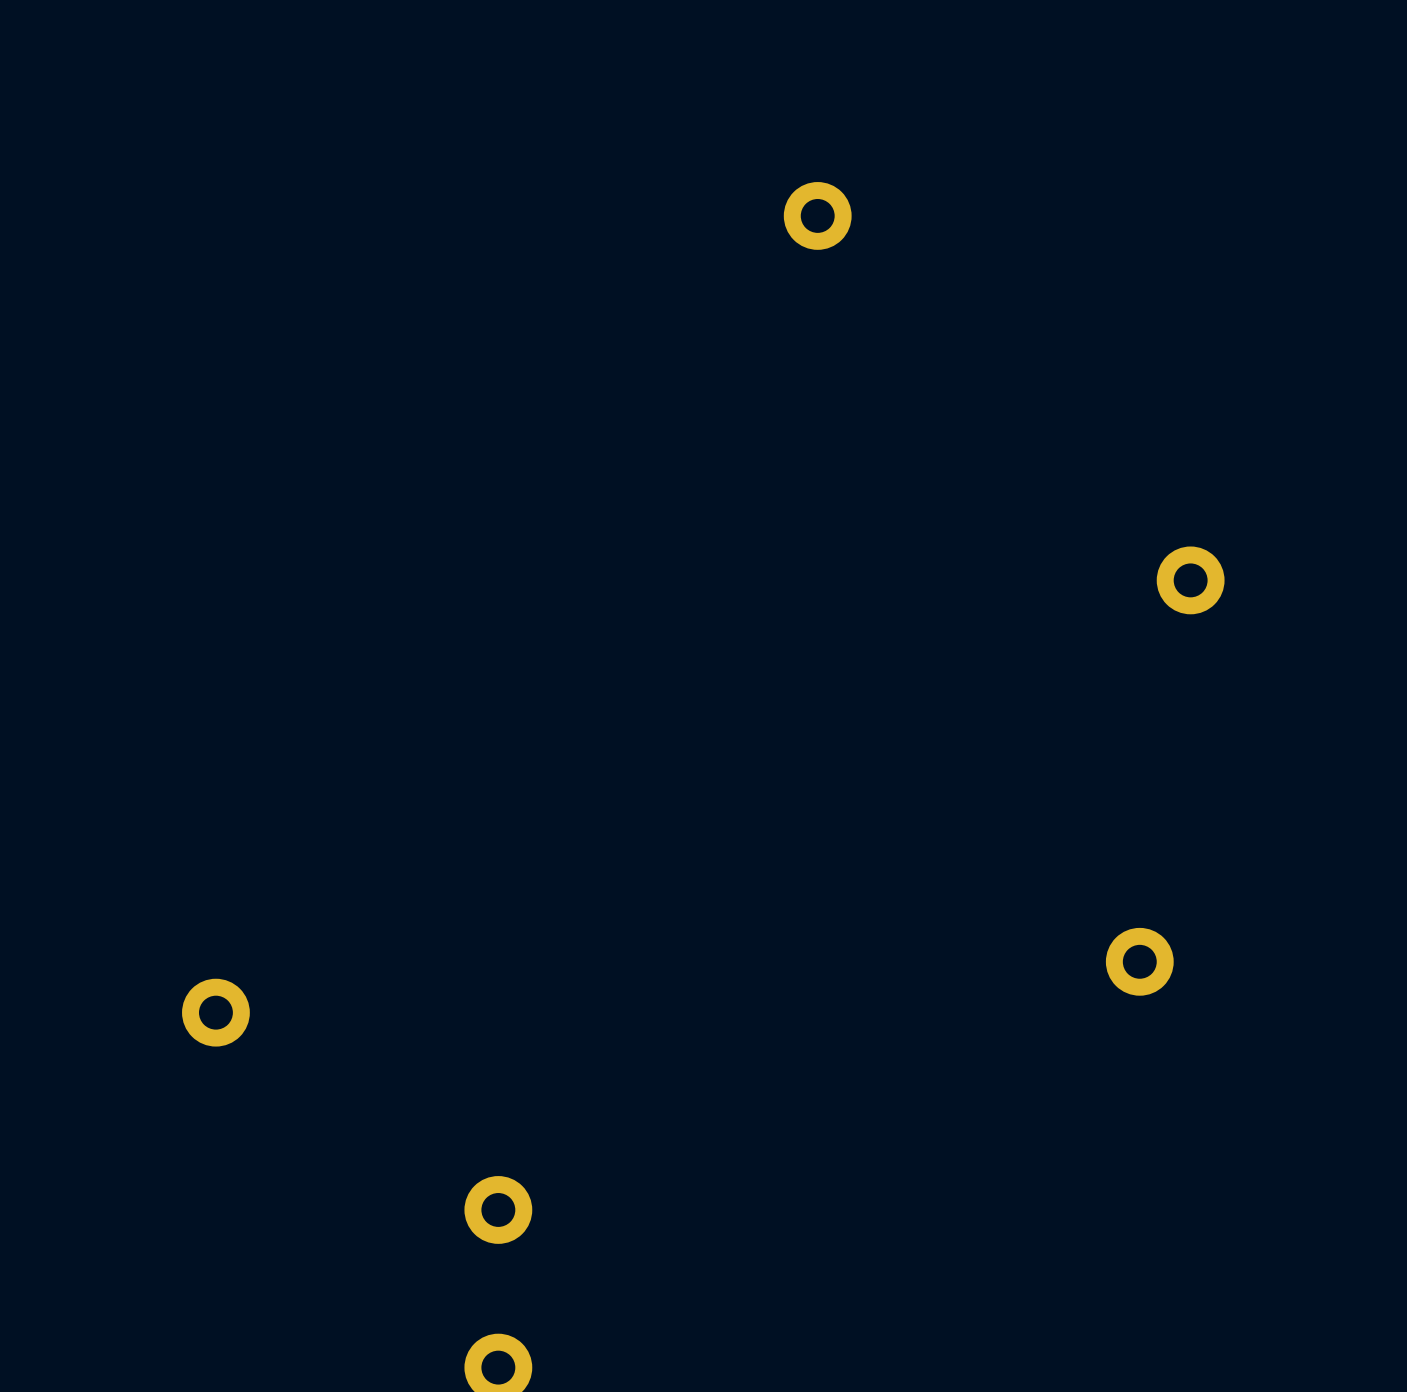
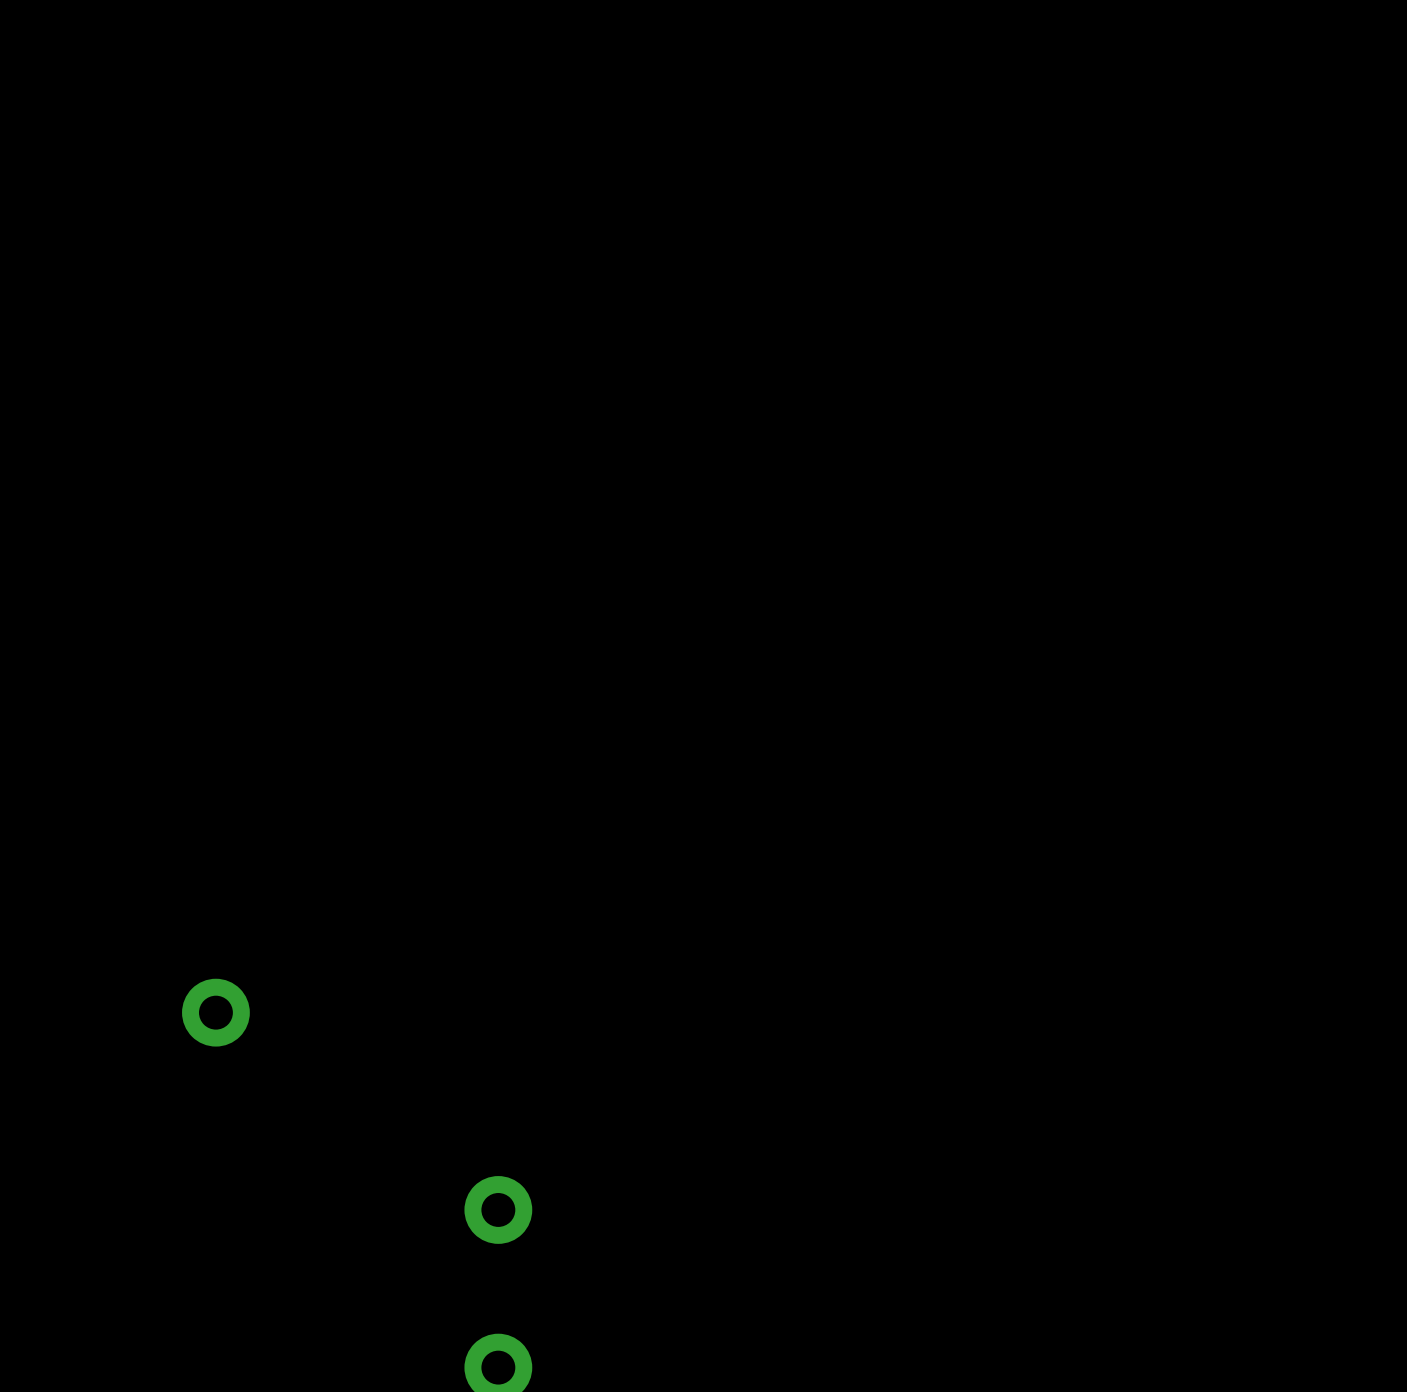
part: (817, 215) -> none
part: (1190, 580) -> none
part: (1139, 961) -> none

